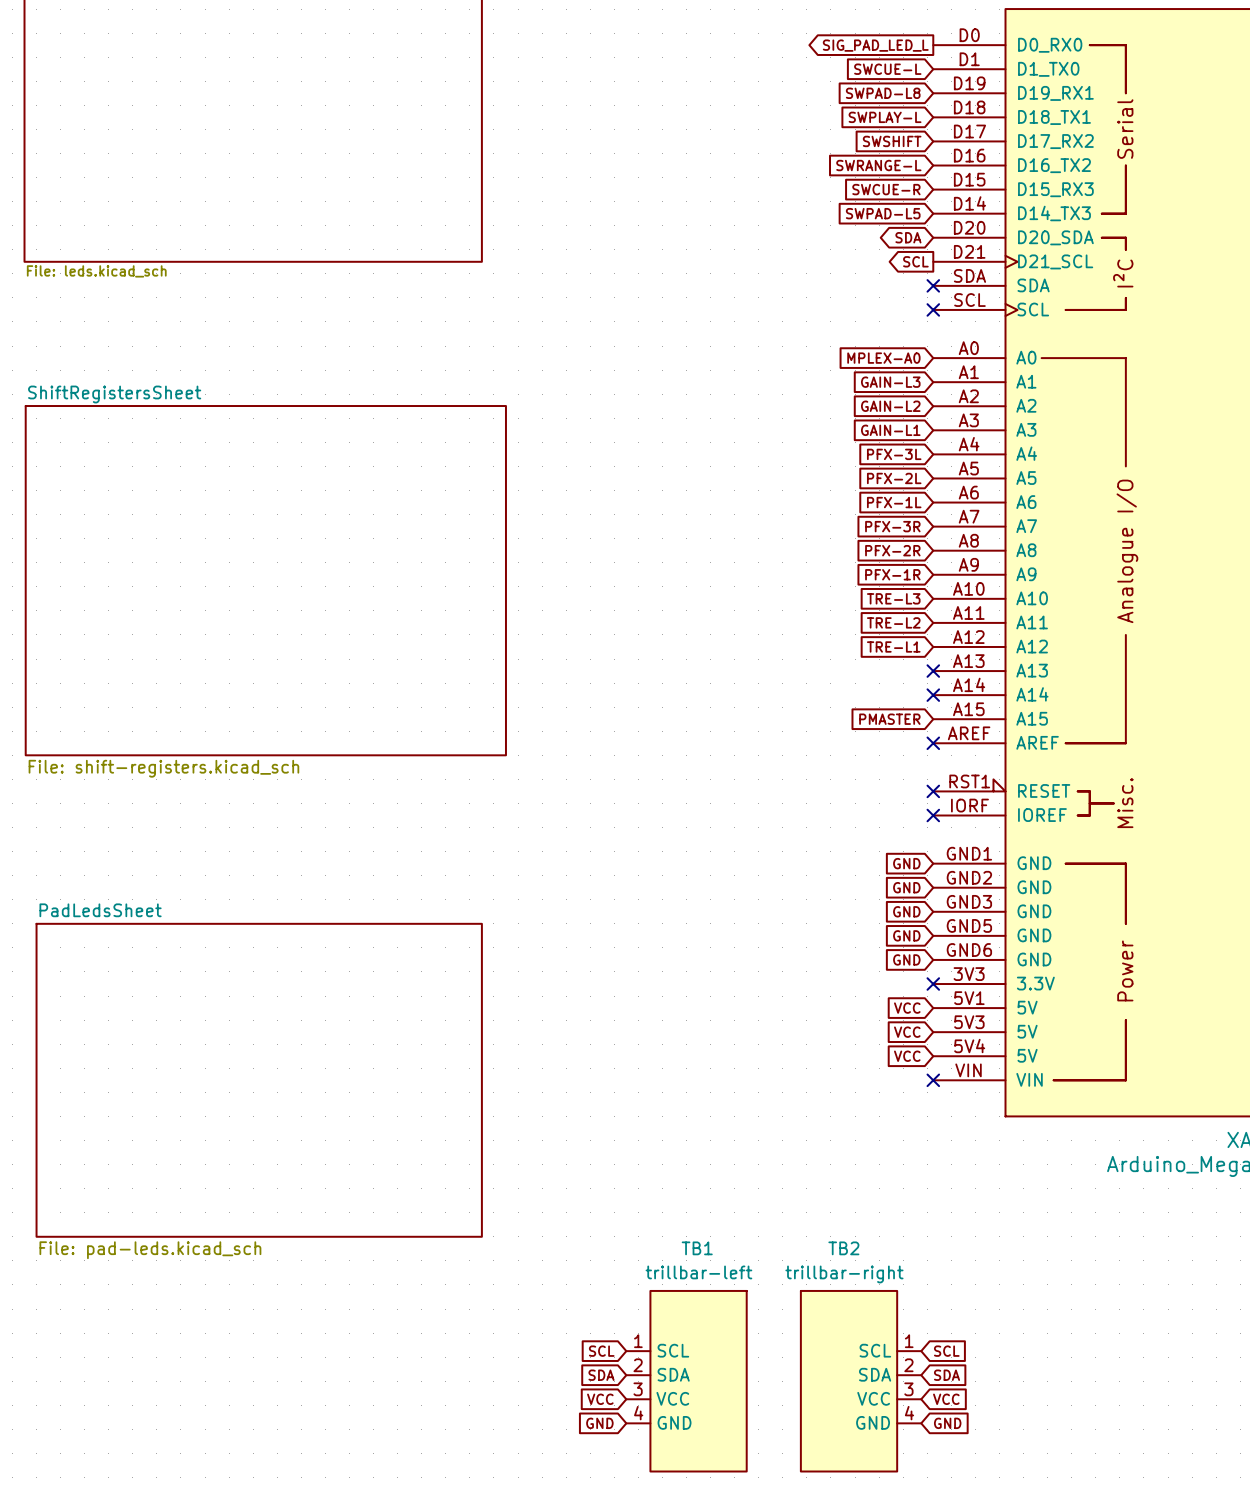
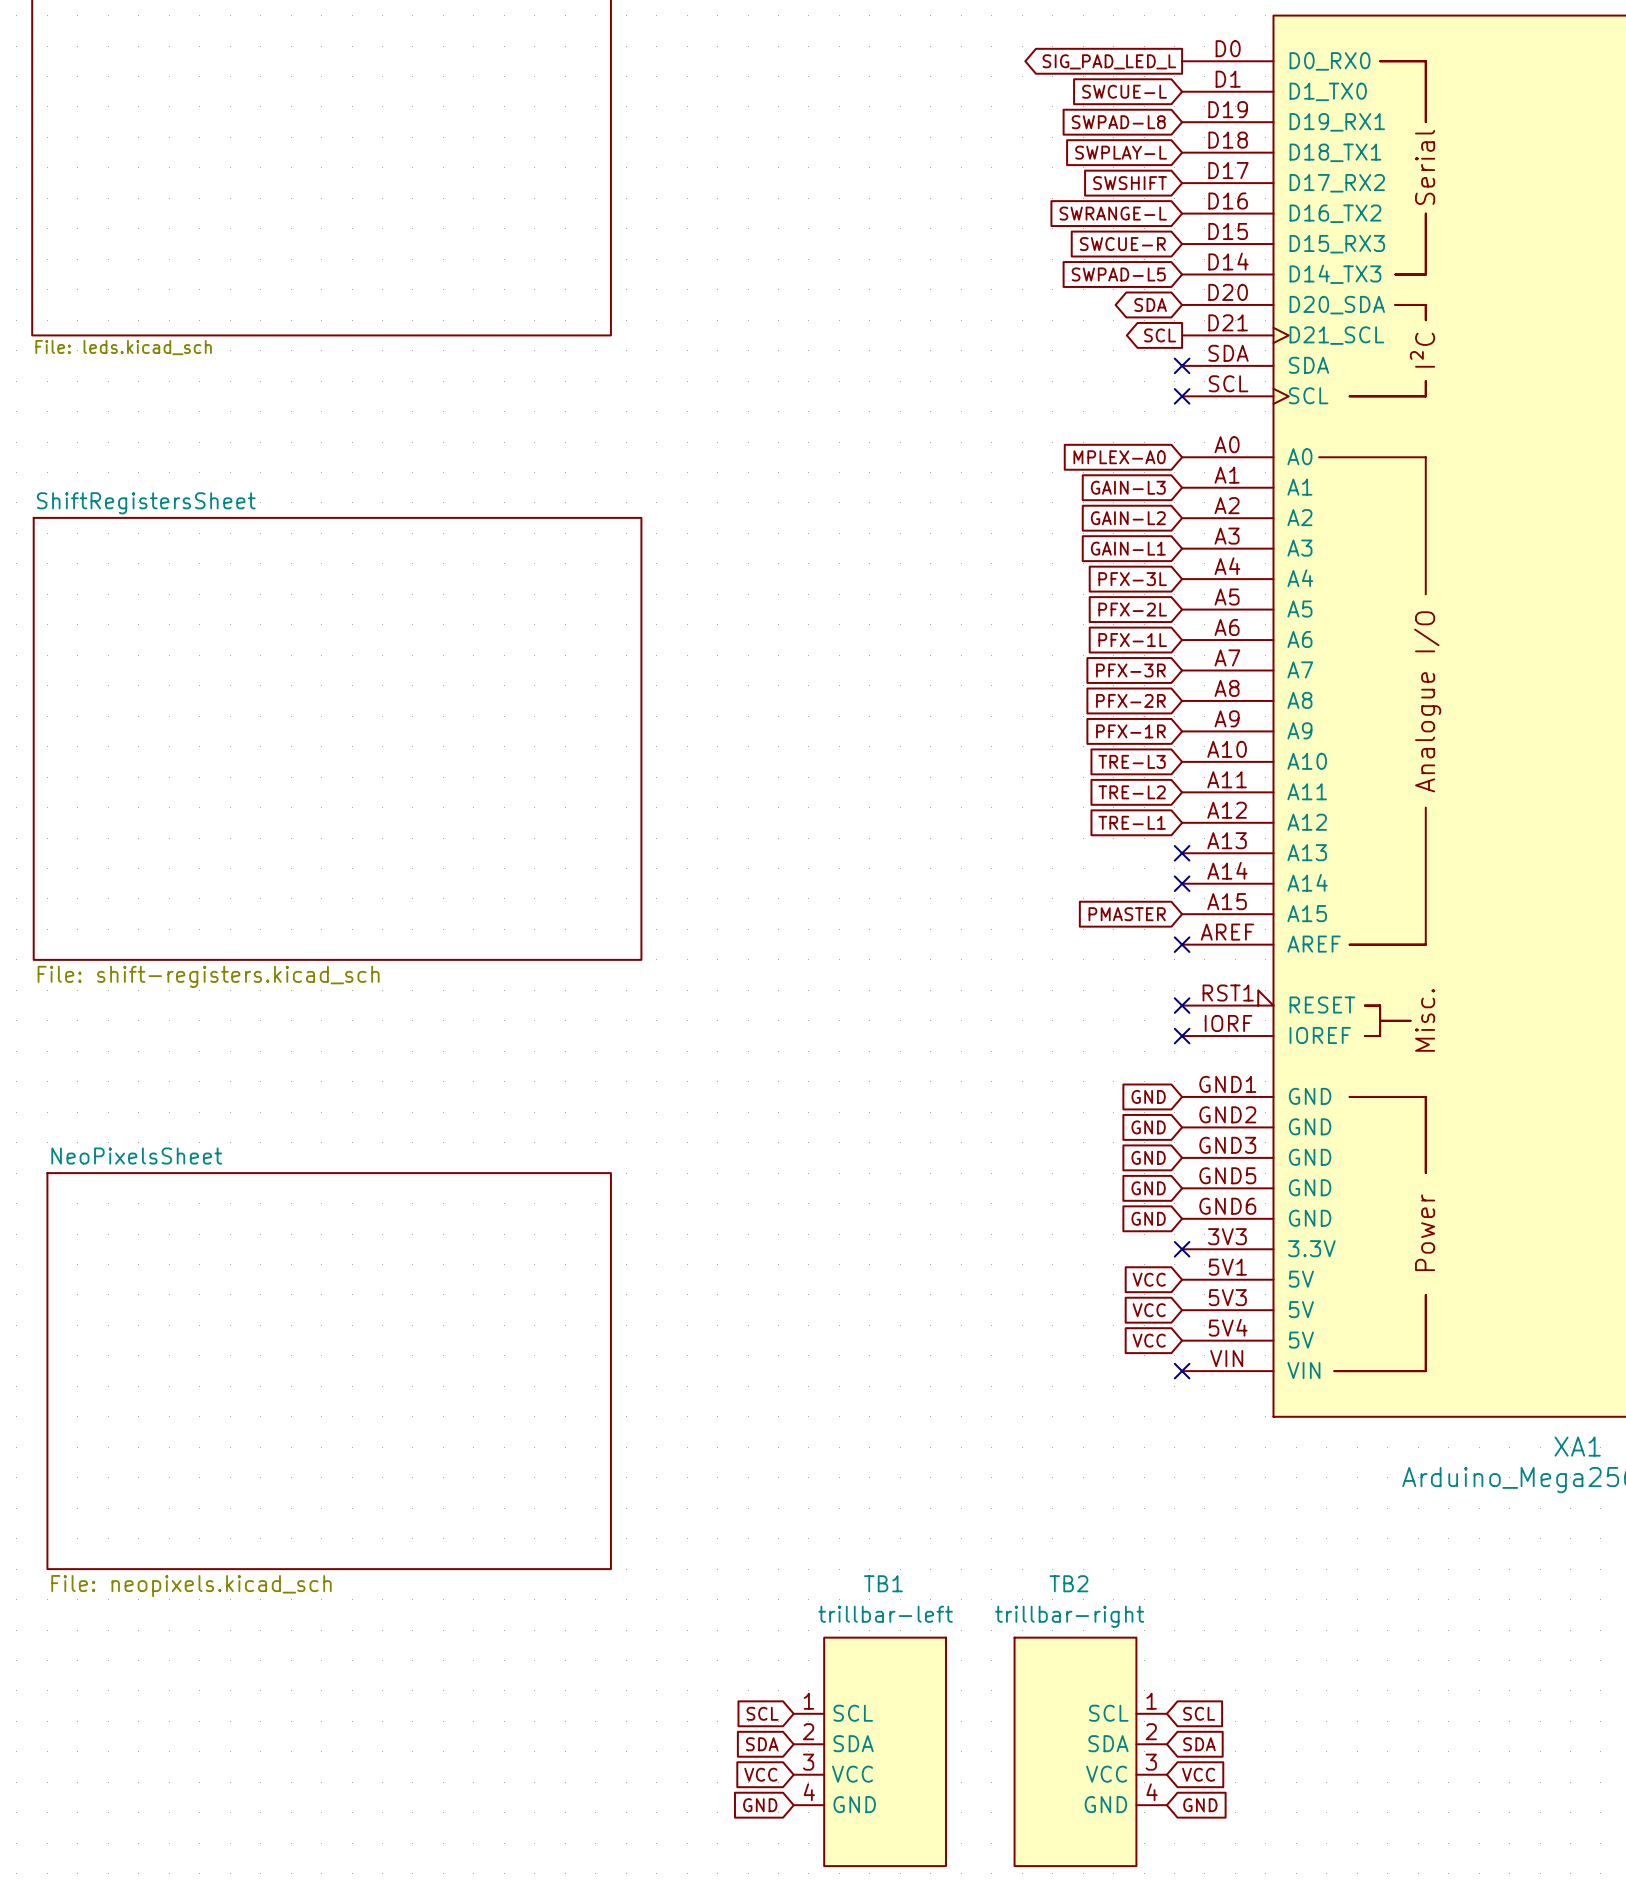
sheet PadLedsSheet name: PadLedsSheet (100, 910) -> NeoPixelsSheet (136, 1156)
sheet PadLedsSheet value: File: pad-leds.kicad_sch (150, 1250) -> File: neopixels.kicad_sch (191, 1586)

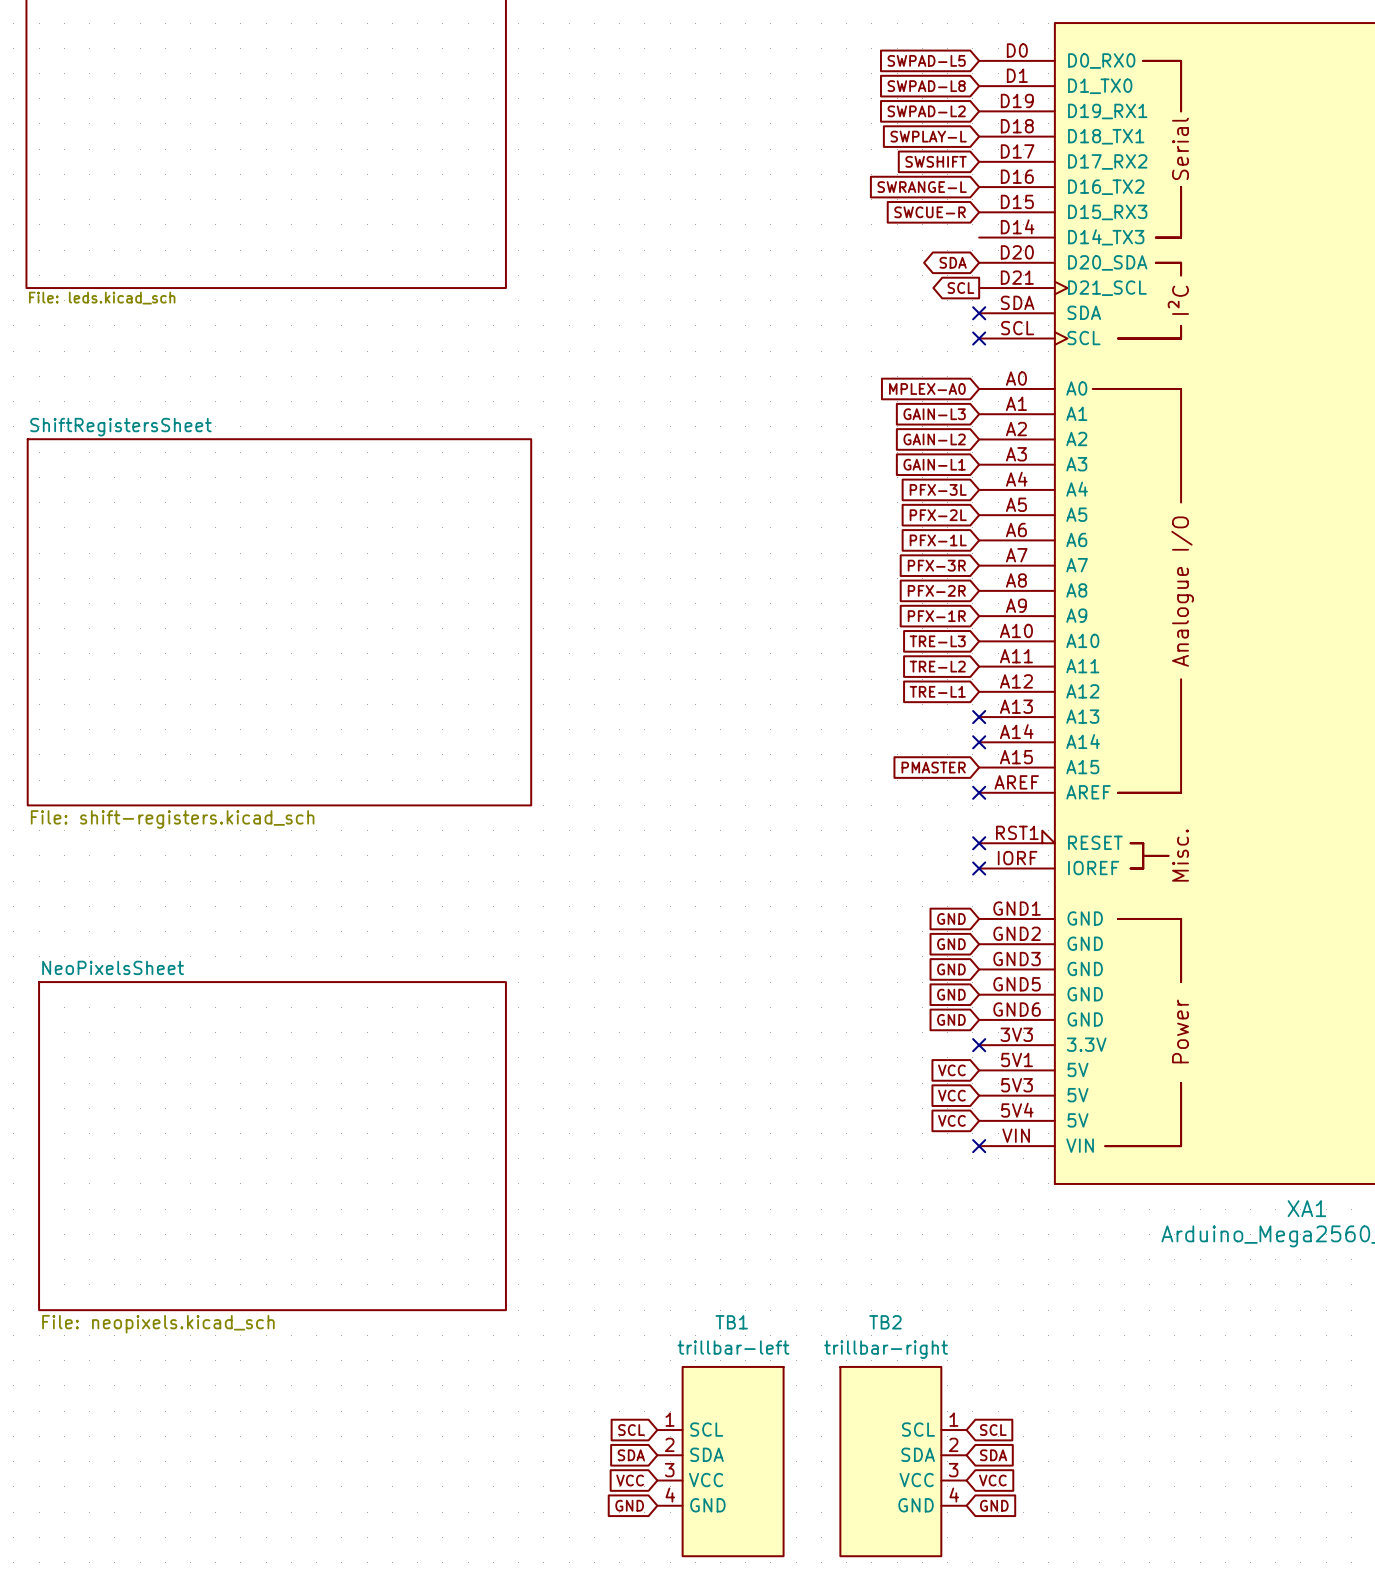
global label shape: output (1109, 61) -> input (926, 60)
global label: SIG_PAD_LED_L (1109, 61) -> SWPAD-L5 (926, 60)
global label: SWCUE-L (1124, 91) -> SWPAD-L8 (926, 86)
global label: SWPAD-L8 (1118, 122) -> SWPAD-L2 (926, 111)
global label: SWPAD-L5 (1118, 274) -> none

